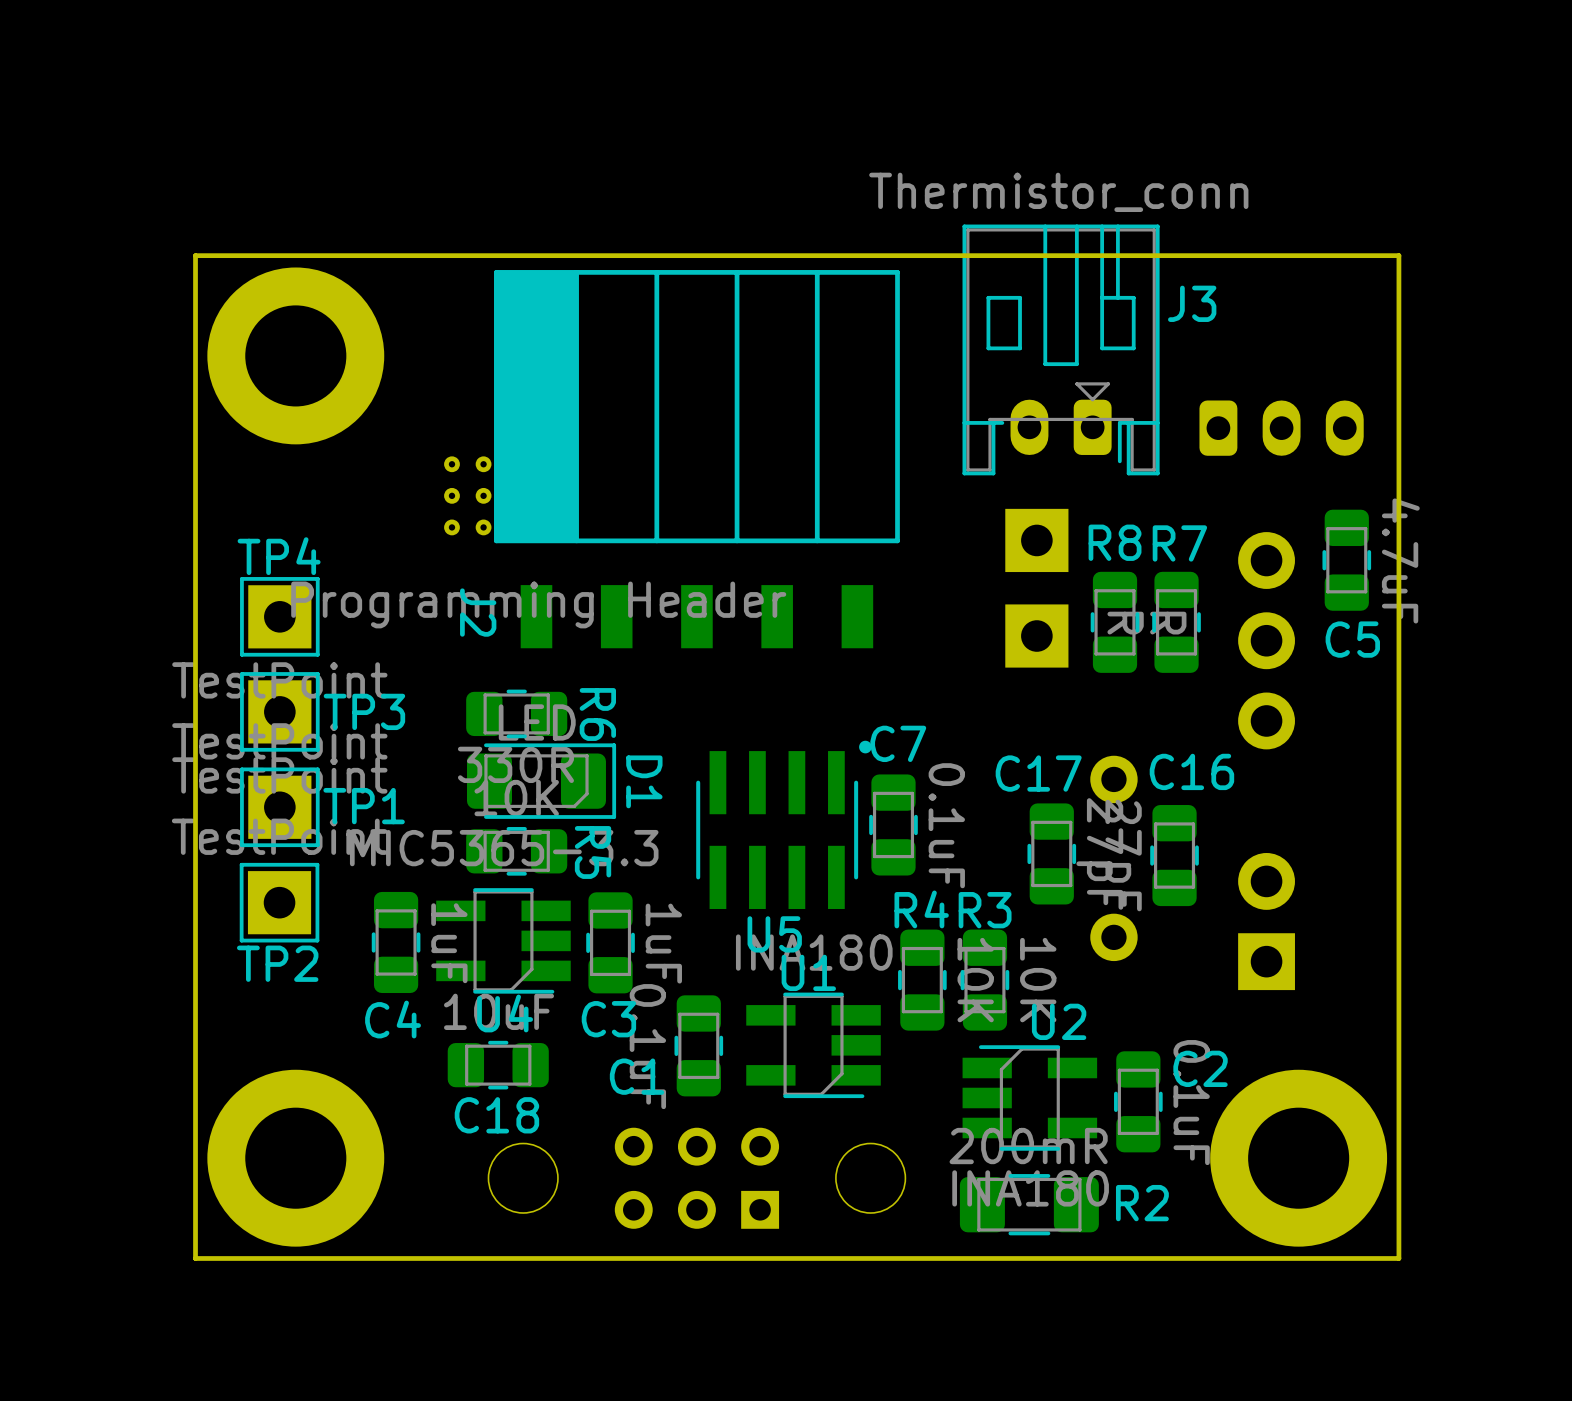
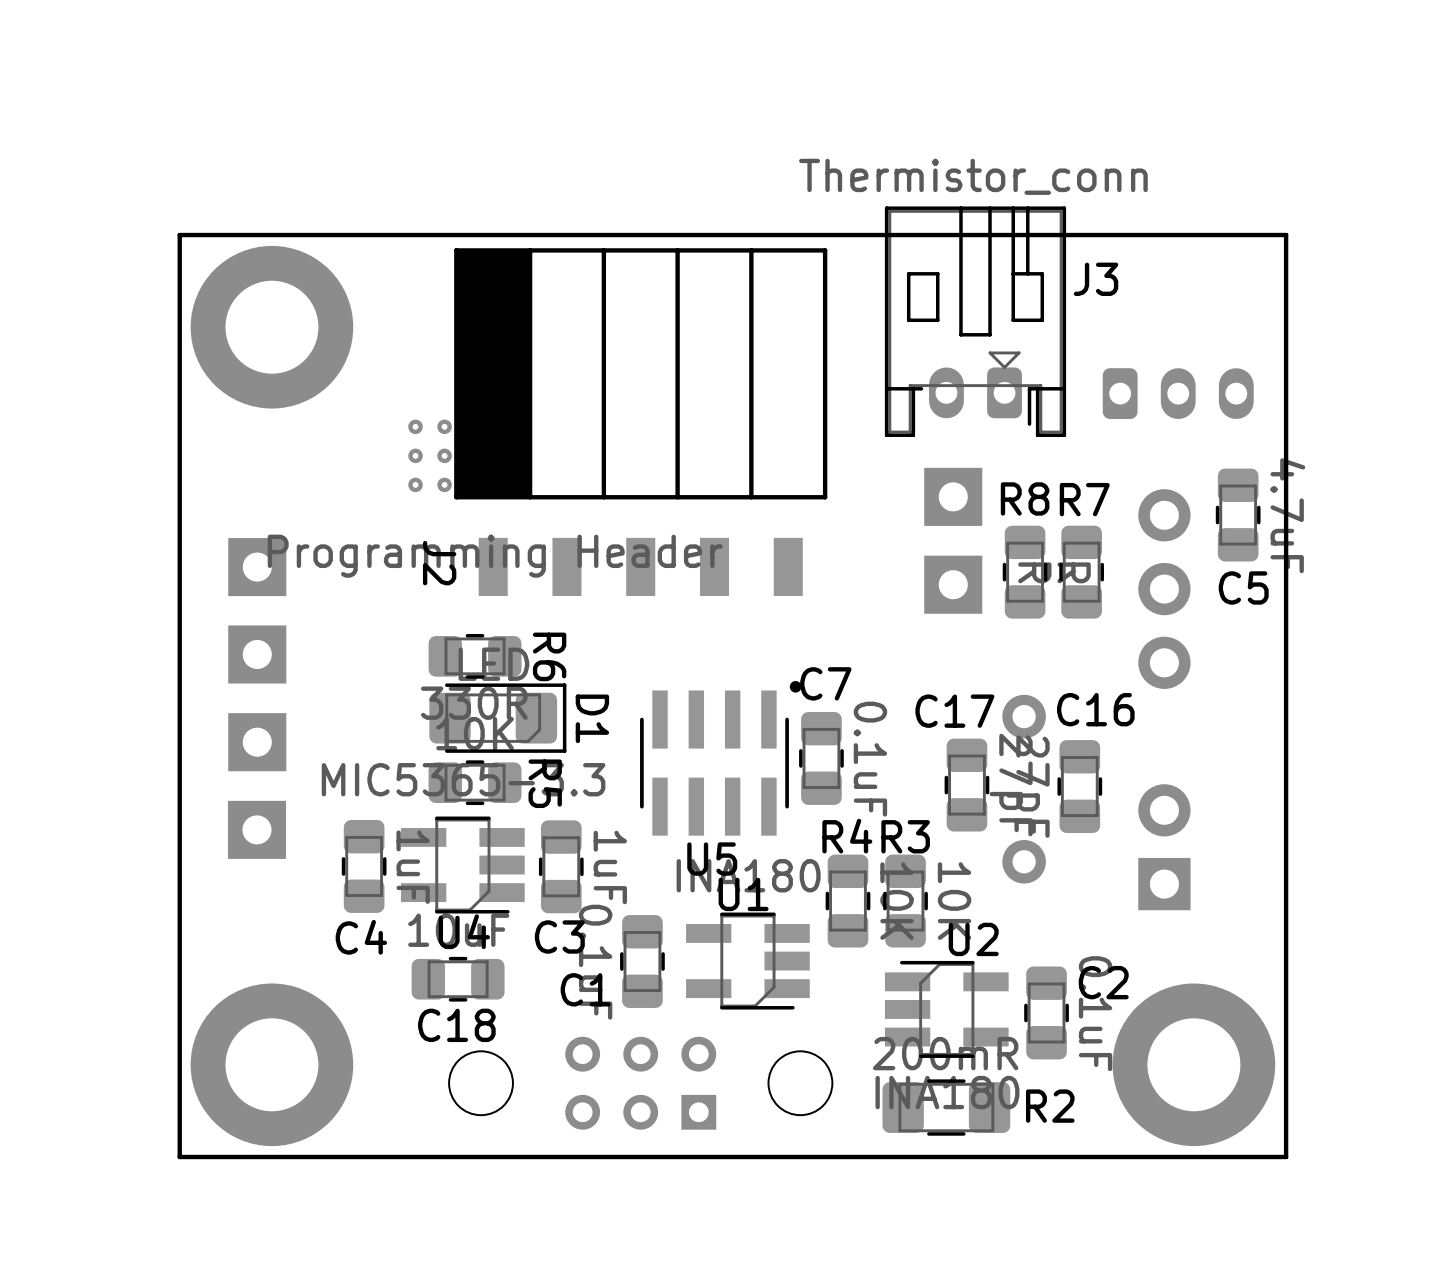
TP4 side: bottom (279, 616) -> top (257, 567)
TP3 side: bottom (279, 711) -> top (257, 654)
TP1 side: bottom (279, 807) -> top (257, 742)
TP2 side: bottom (279, 902) -> top (256, 829)

